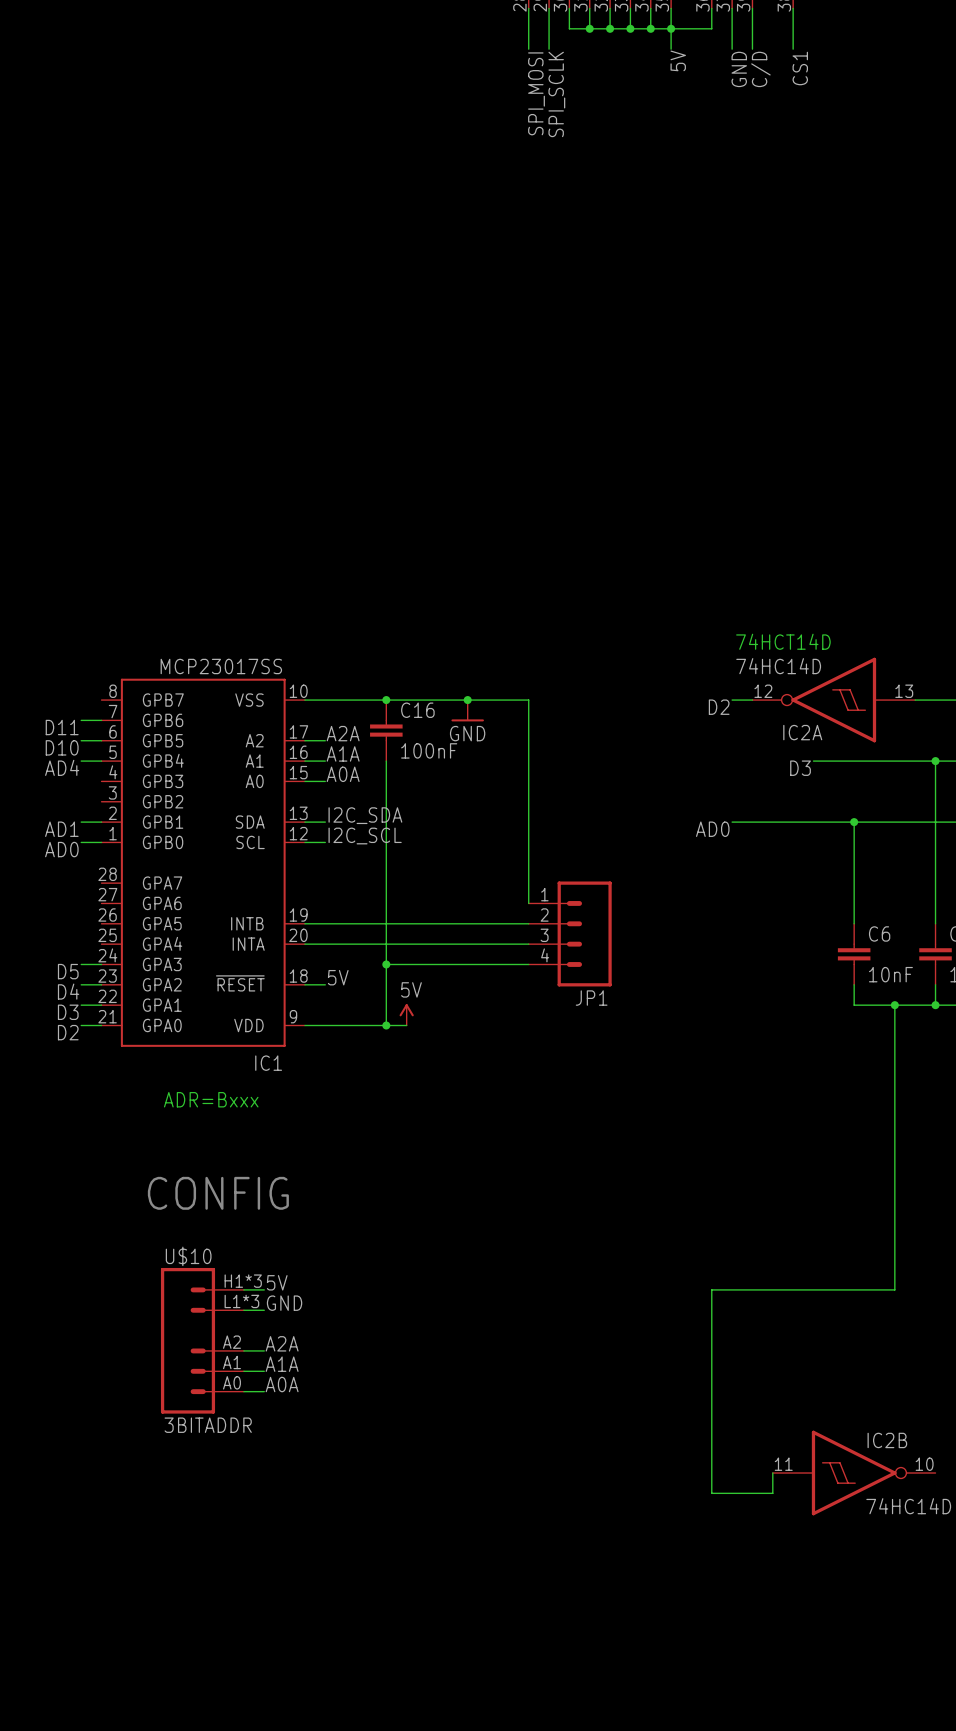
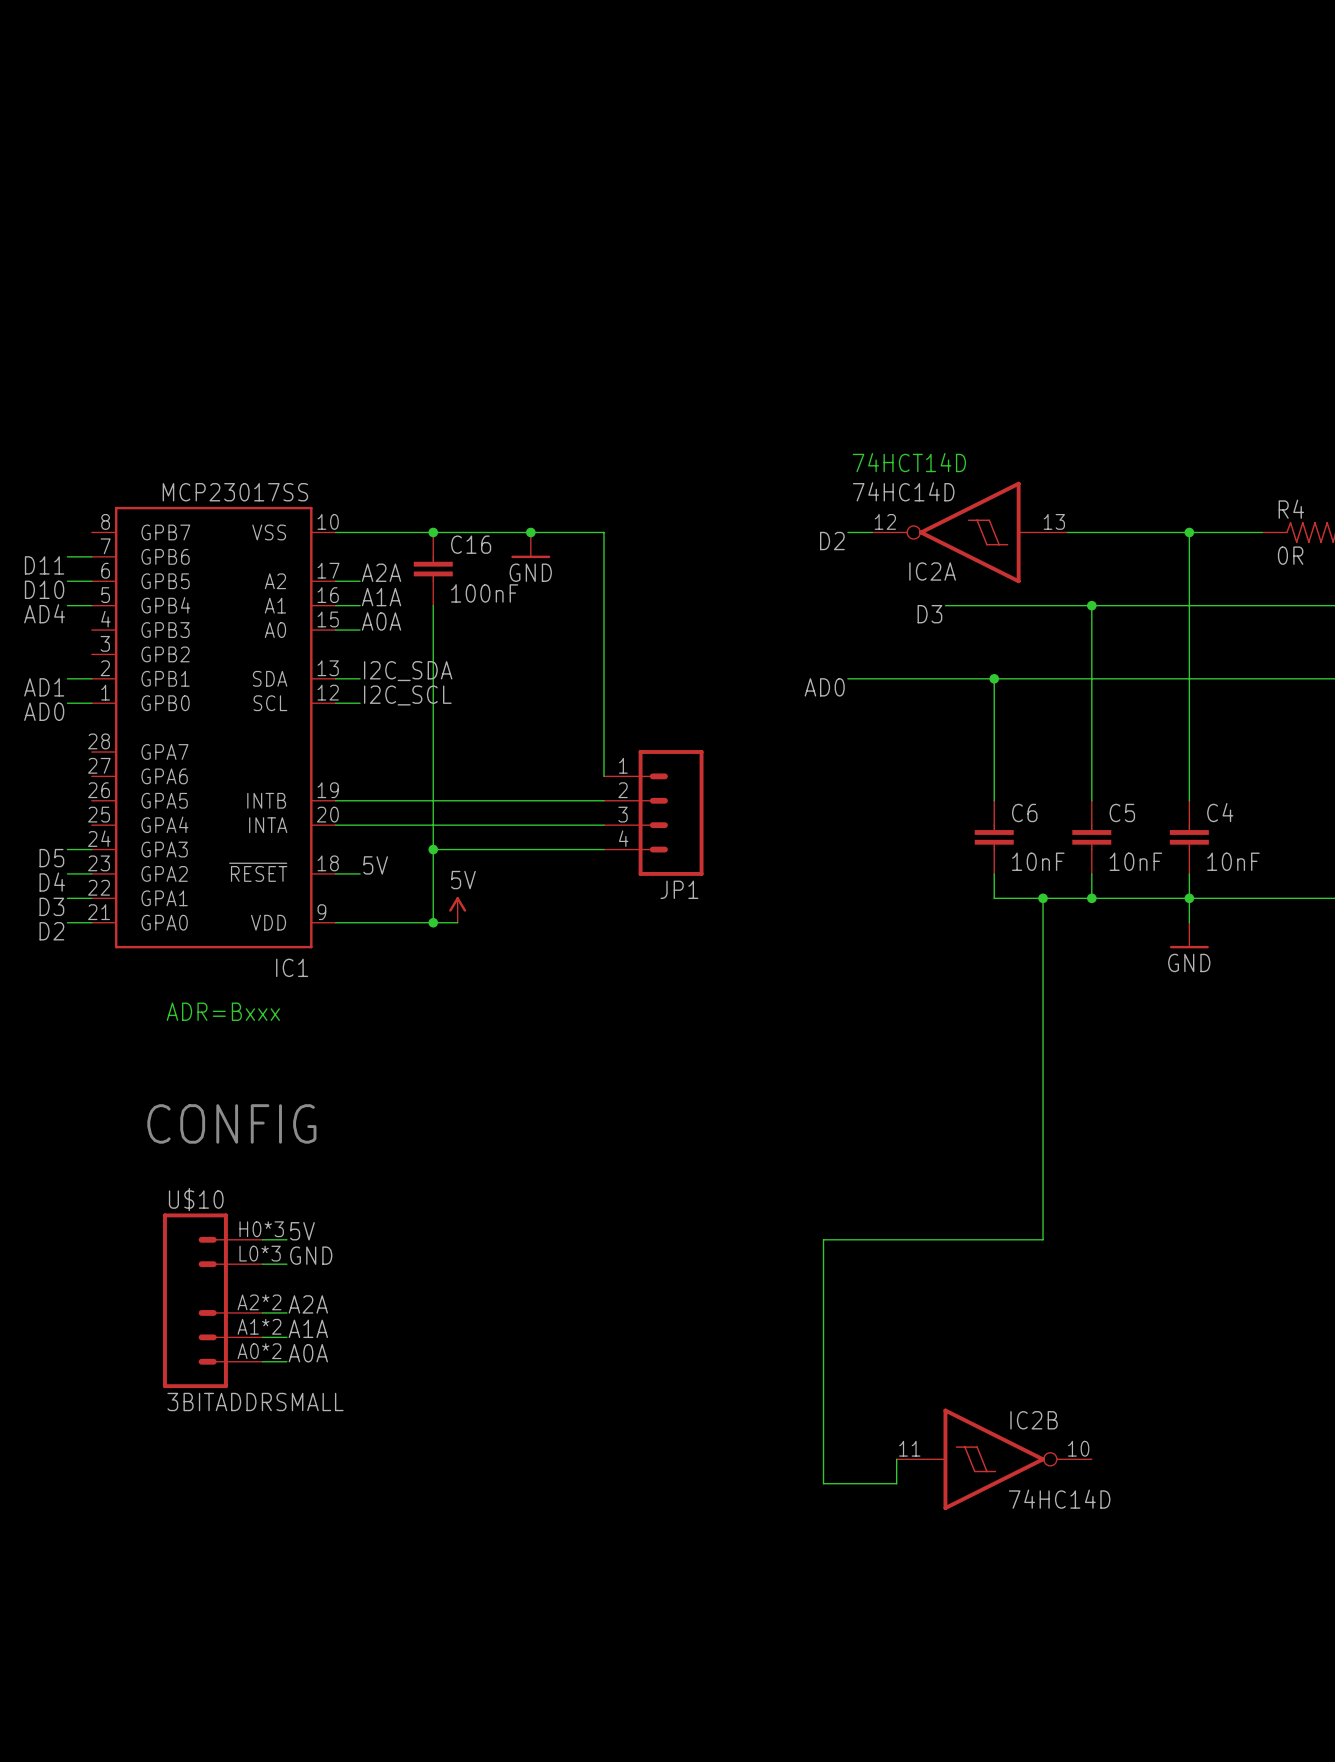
U$10 pin number: H1*3 (243, 1281) -> H0*3 (261, 1229)
U$10 pin number: L1*3 (241, 1301) -> L0*3 (260, 1253)
U$10 pin number: A2 (231, 1342) -> A2*2 (259, 1302)
U$10 pin number: A1 (231, 1362) -> A1*2 (259, 1326)
U$10 pin number: A0 (231, 1382) -> A0*2 (259, 1351)
U$10 value: 3BITADDR (208, 1425) -> 3BITADDRSMALL (255, 1401)

